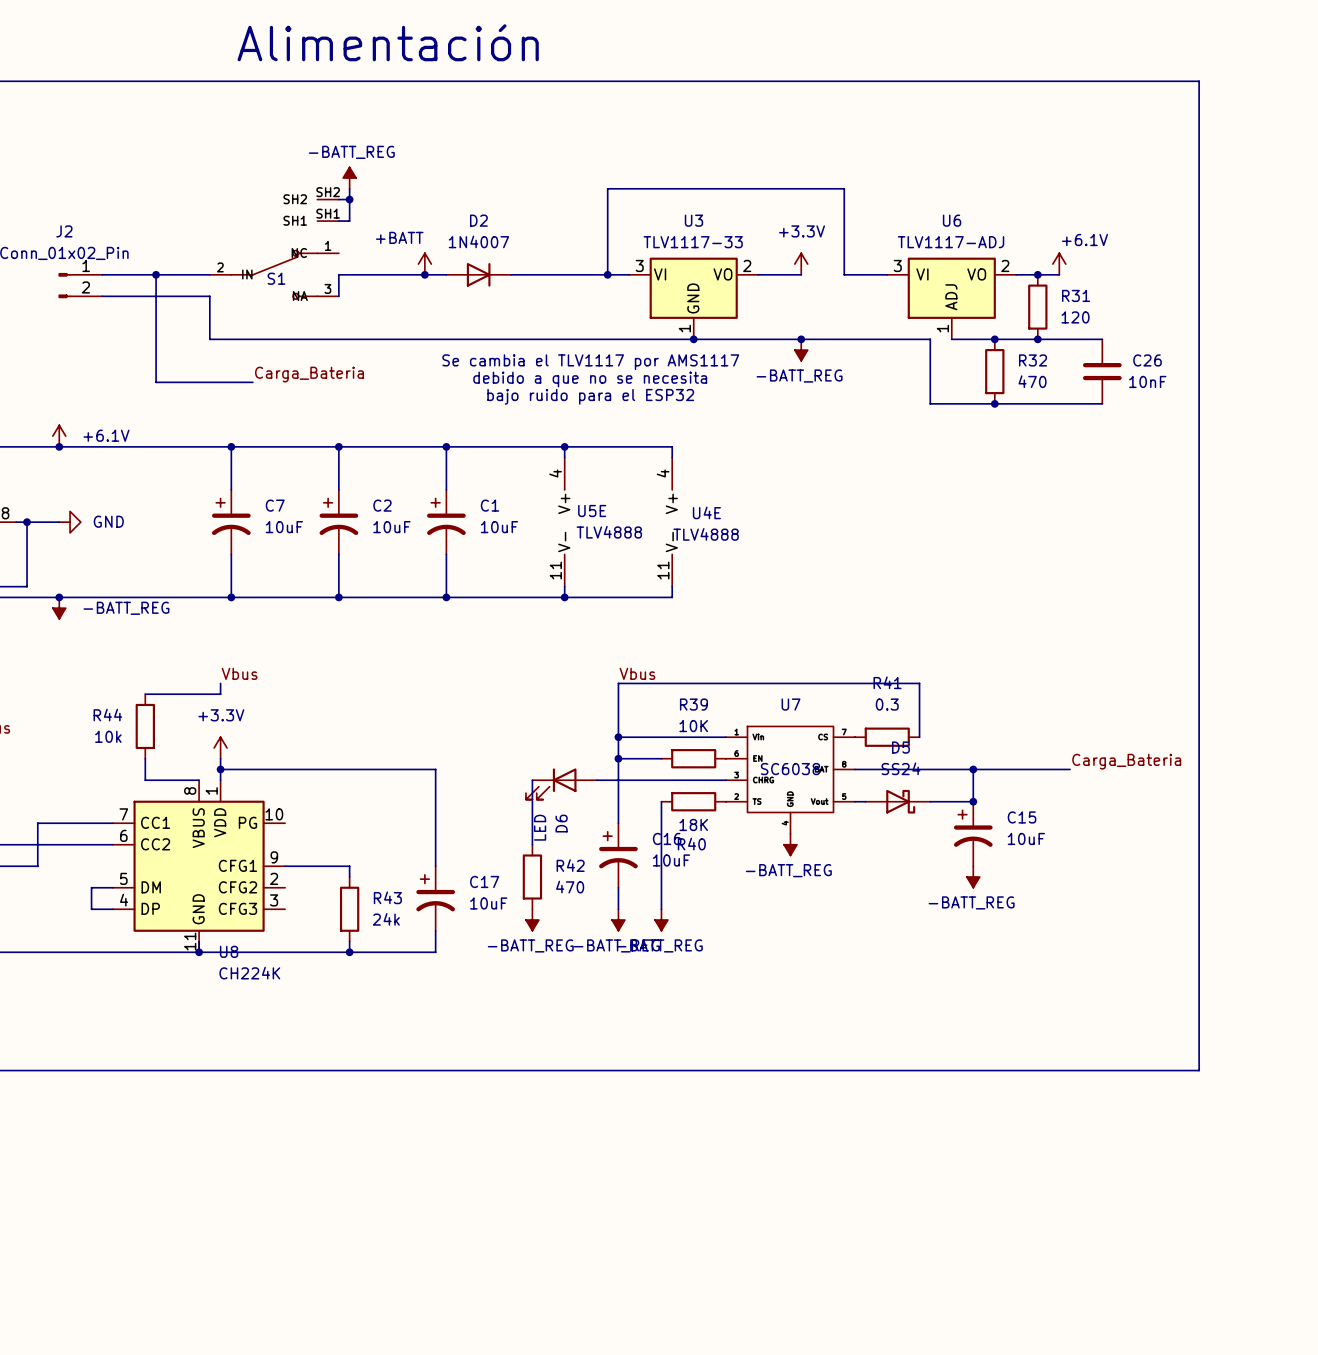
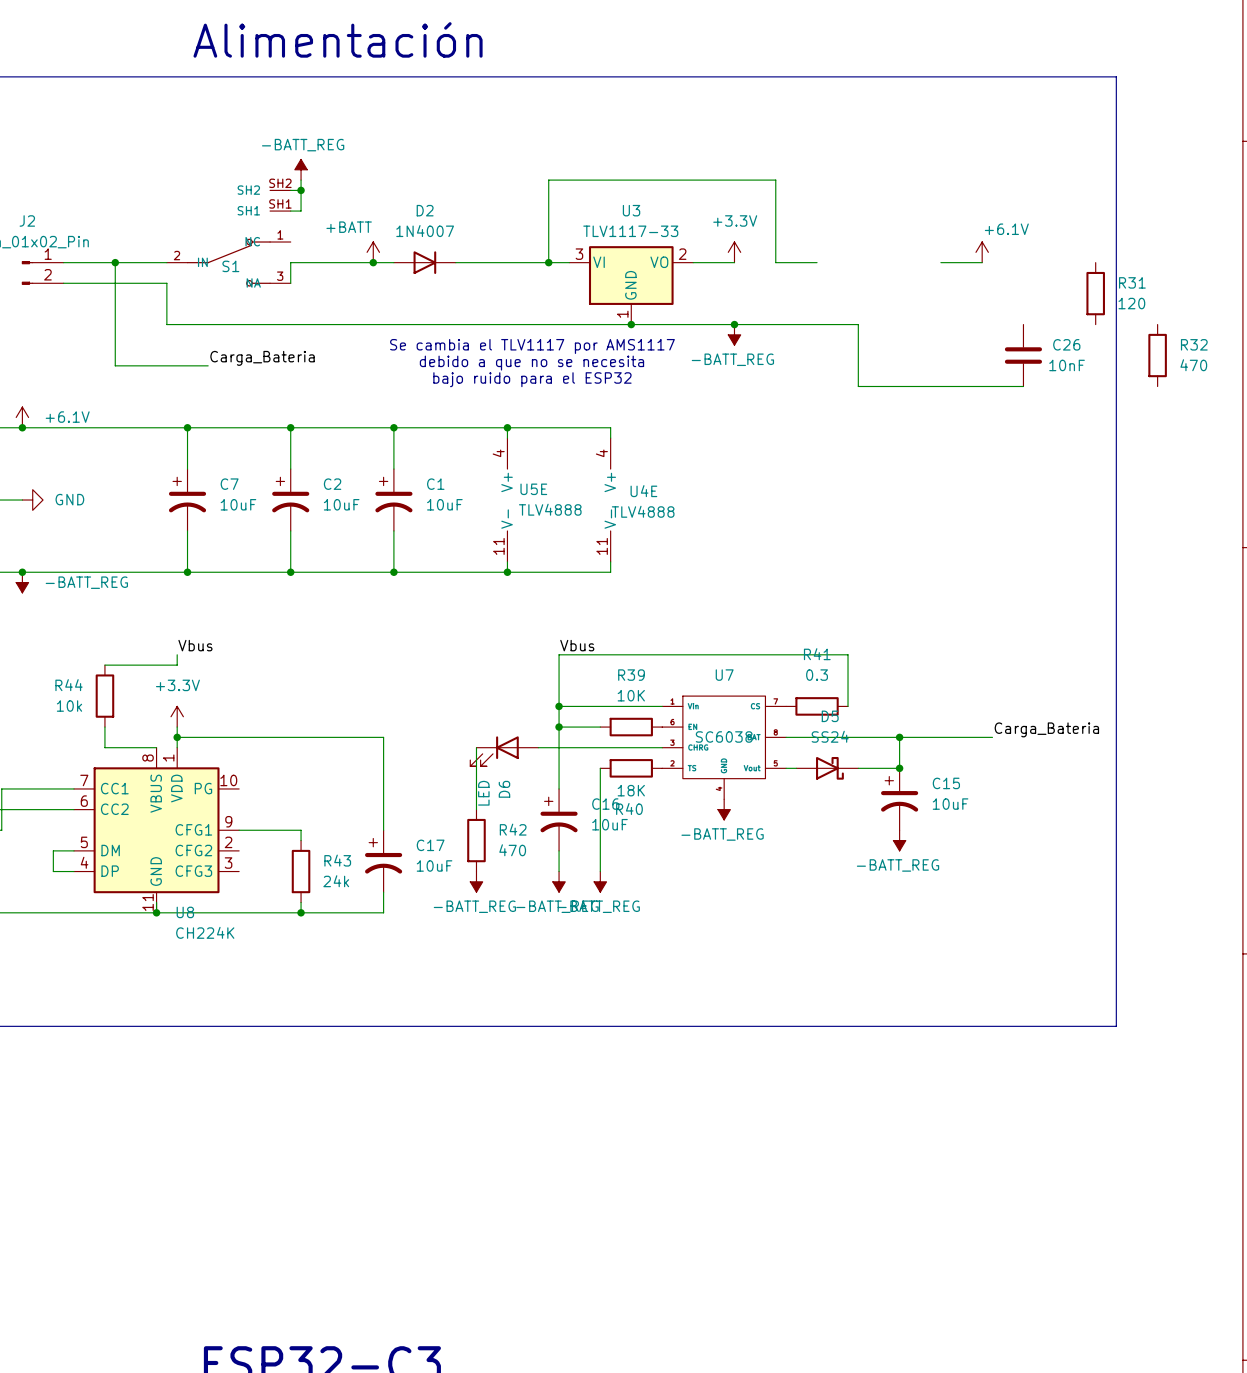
junction: (1037, 274) -> none
U6: TLV1117-ADJ (951, 298) -> none
R31 position: (1037, 307) -> (1095, 293)
wire: (951, 339) (1102, 339) -> none
junction: (994, 339) -> none
junction: (1037, 339) -> none
R32 position: (994, 371) -> (1157, 355)
junction: (994, 403) -> none

